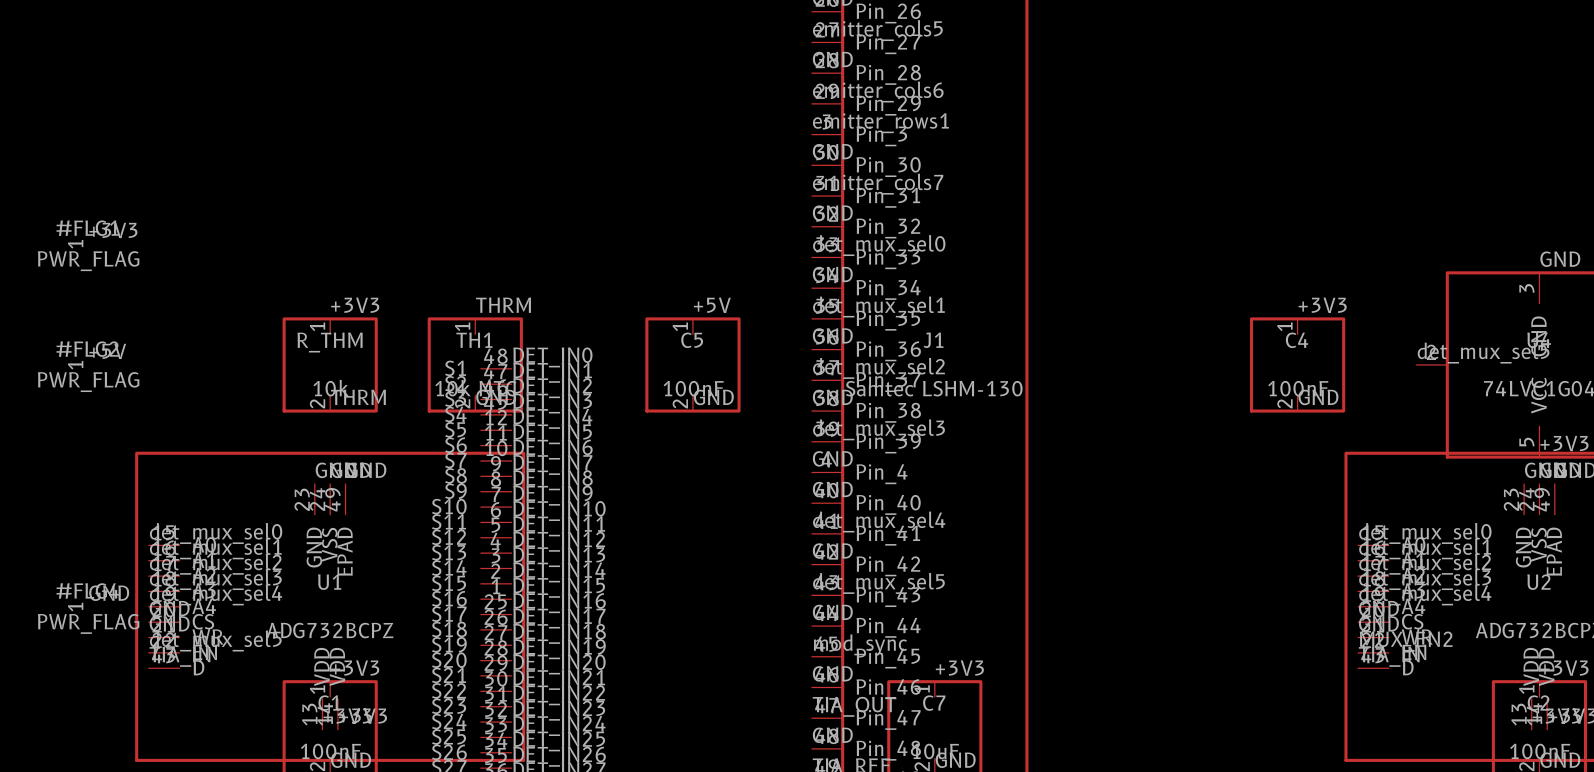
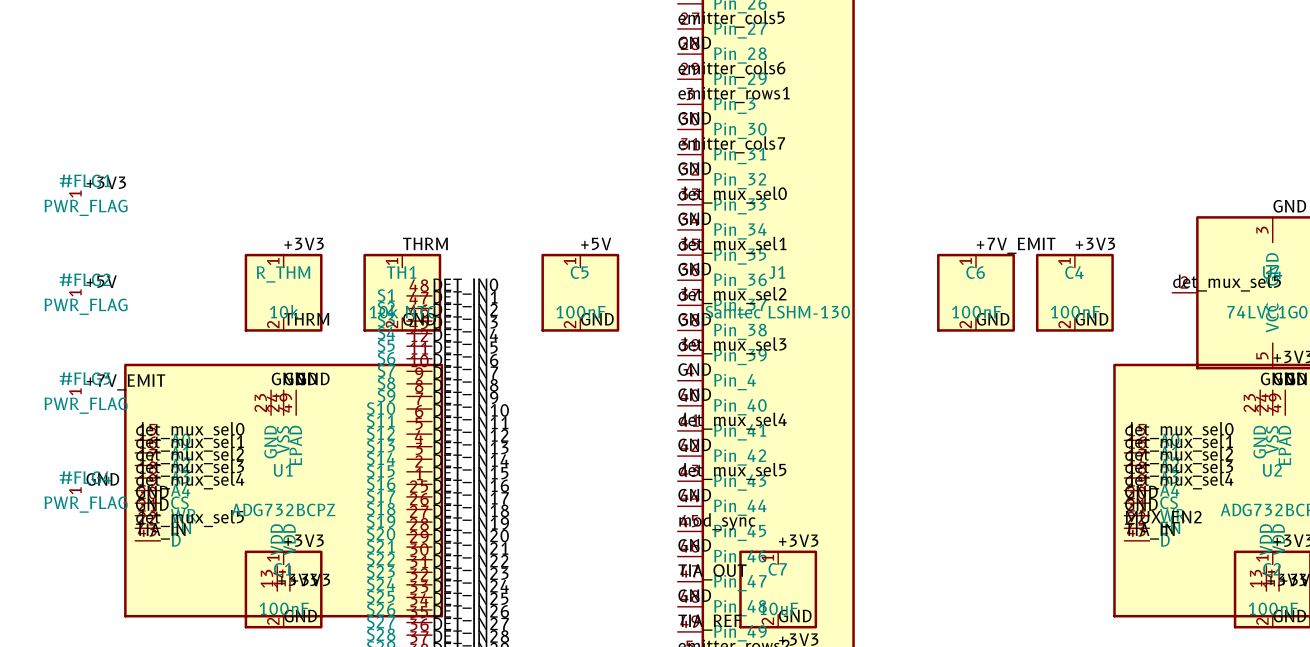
label: none -> +7V_EMIT (1016, 245)
C6: none -> 100nF (976, 292)
label: none -> GND (993, 319)
label: none -> +7V_EMIT (125, 382)
#FLG3: none -> PWR_FLAG (86, 393)

